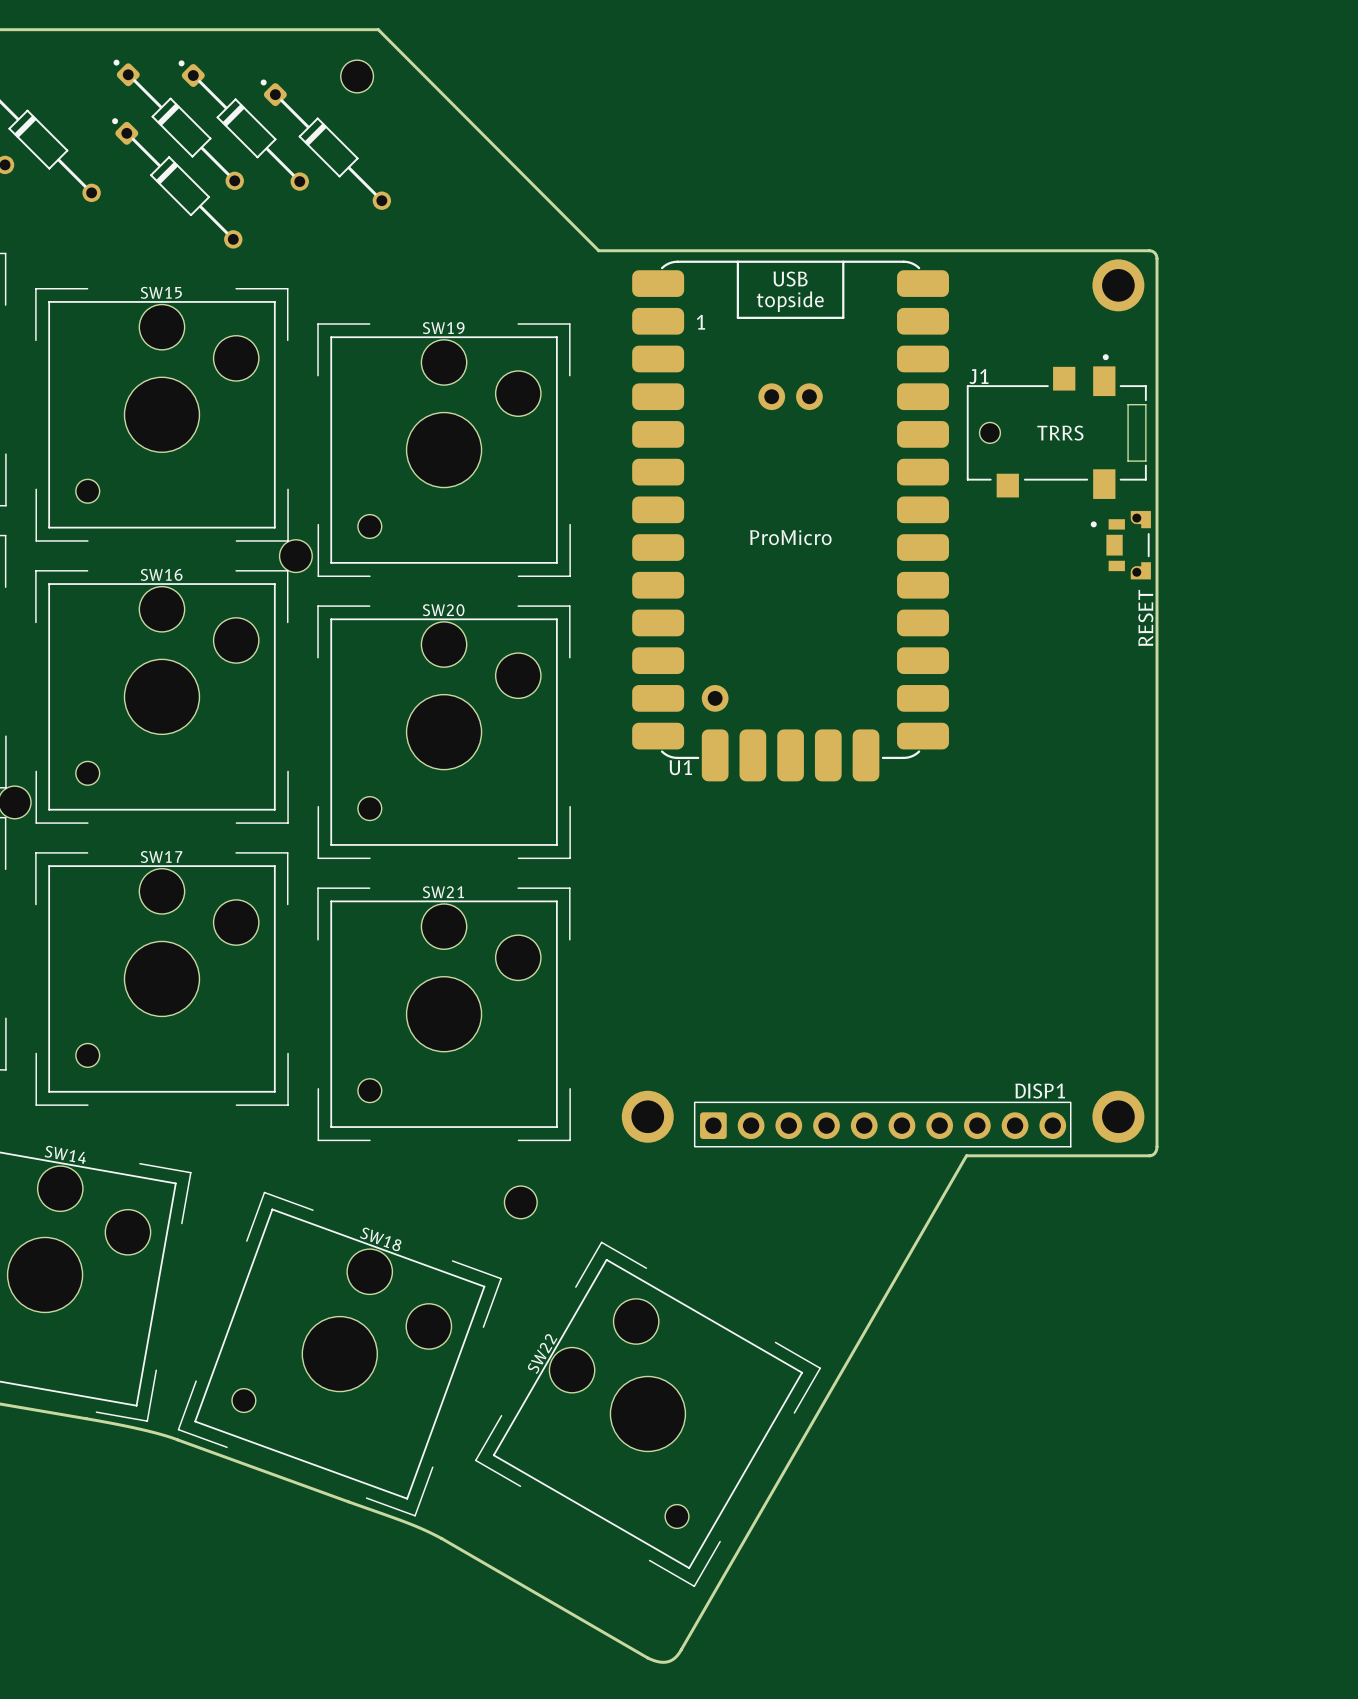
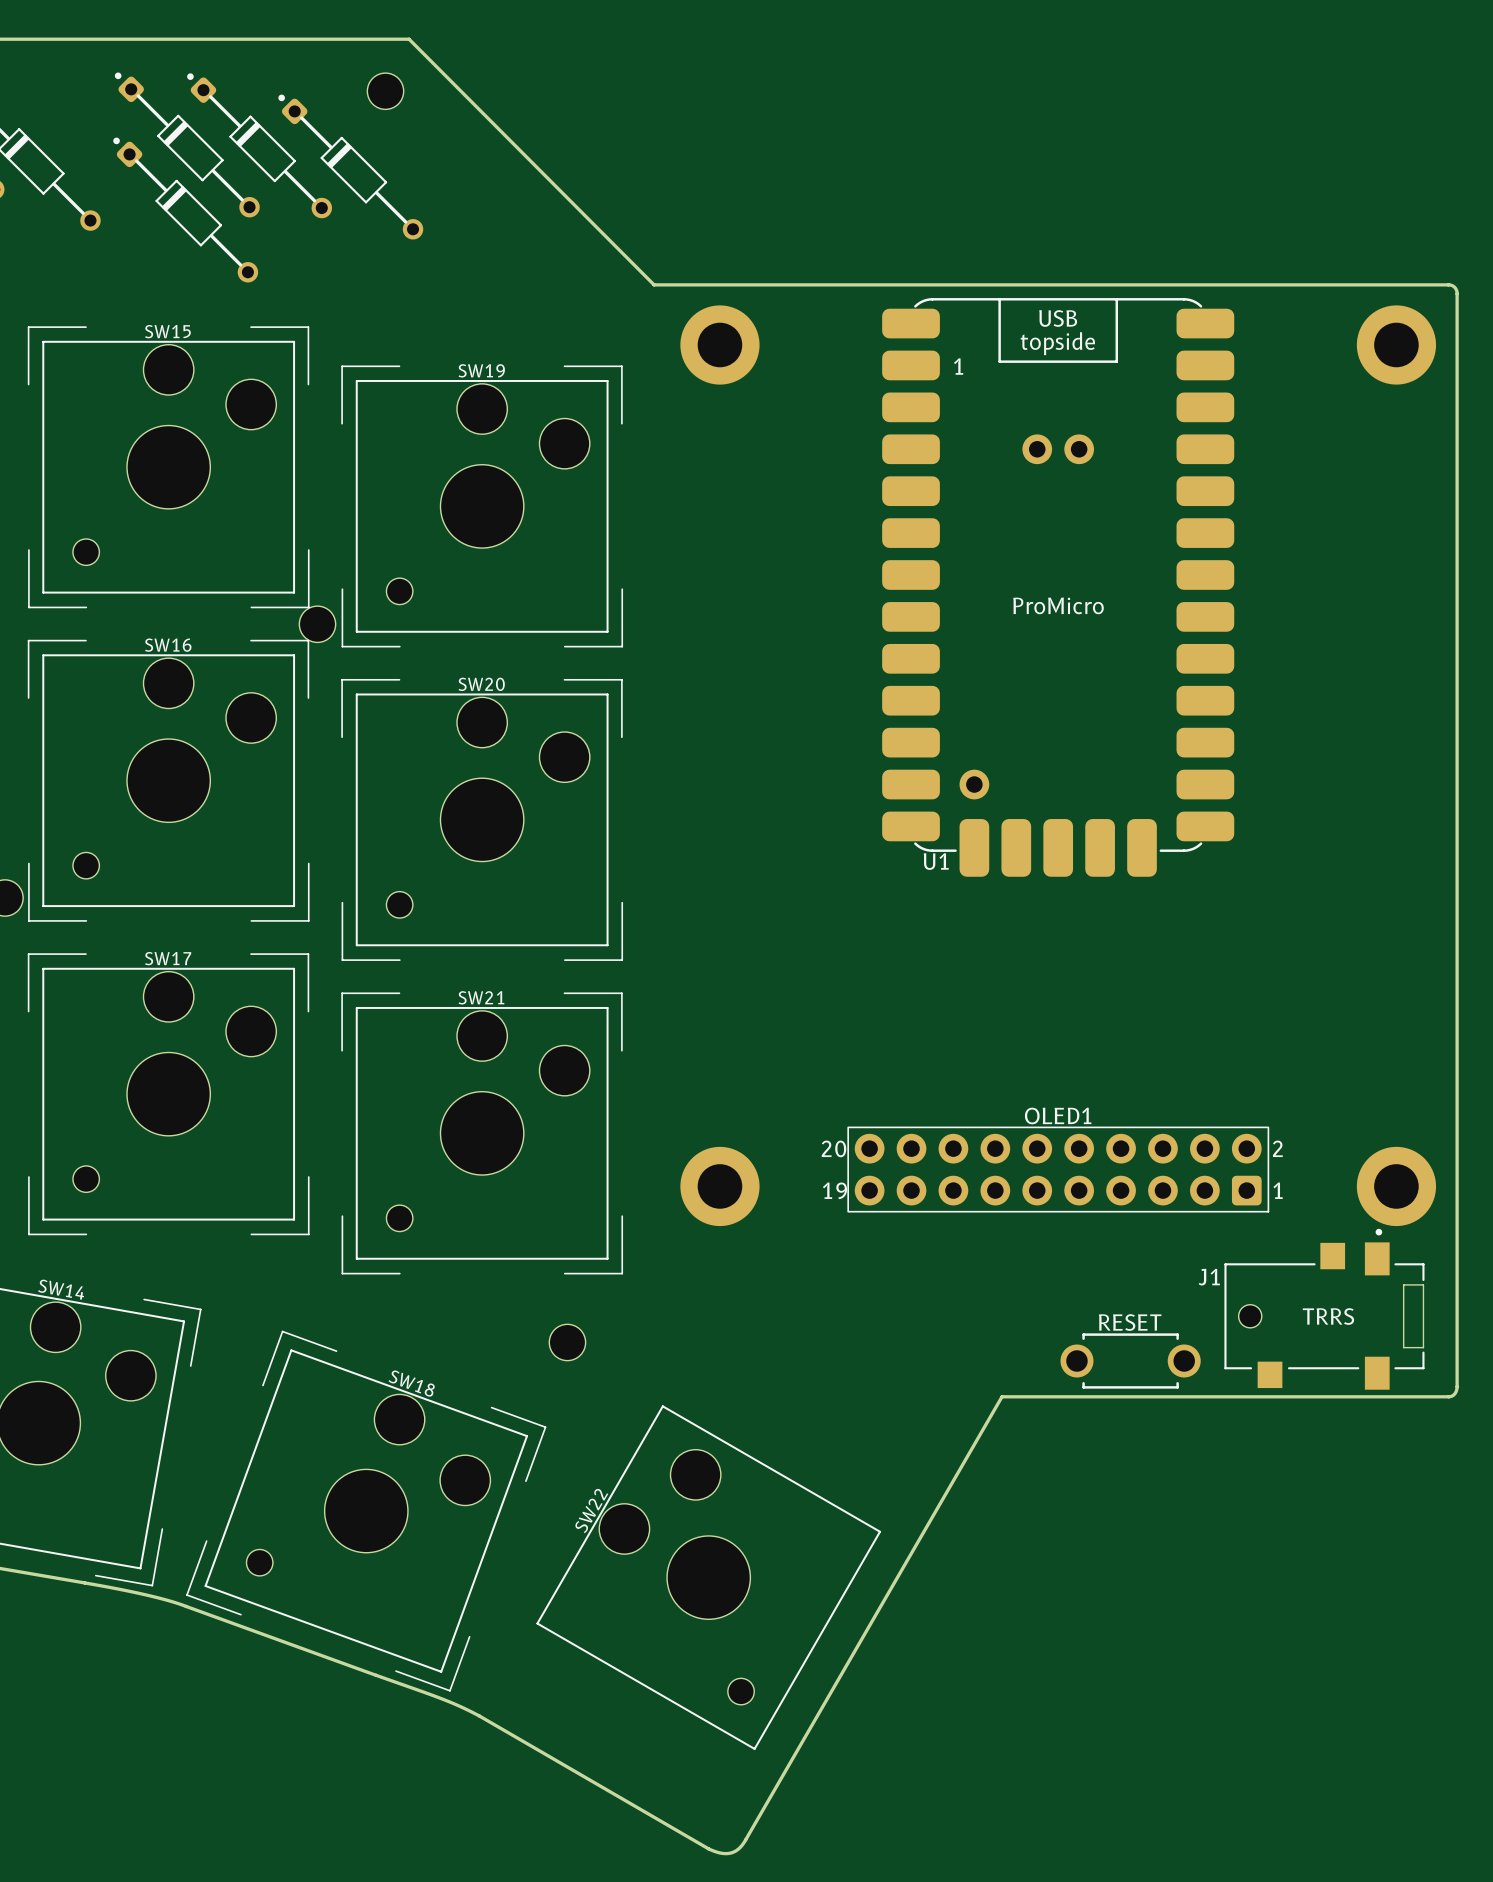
board edge: (1149, 250) (1154, 252) (1157, 258) (1156, 1150) (1149, 1155) (966, 1155) (681, 1649) -> (1265, 284) (1449, 284) (1454, 287) (1456, 291) (1456, 1390) (1453, 1395) (1448, 1396) (1002, 1396) (745, 1839)
J1 name position: J1 (978, 376) -> J1 (1209, 1277)
J1 position: (1056, 426) -> (1324, 1309)
U1 position: (790, 521) -> (1058, 587)
RESET: (1120, 545) -> none
OLED1: none -> (1058, 765)
DISP1: (883, 703) -> none
part: none -> (1130, 1360)
SW22 footprint: [474, 1241, 821, 1588] -> [536, 1405, 882, 1750]

